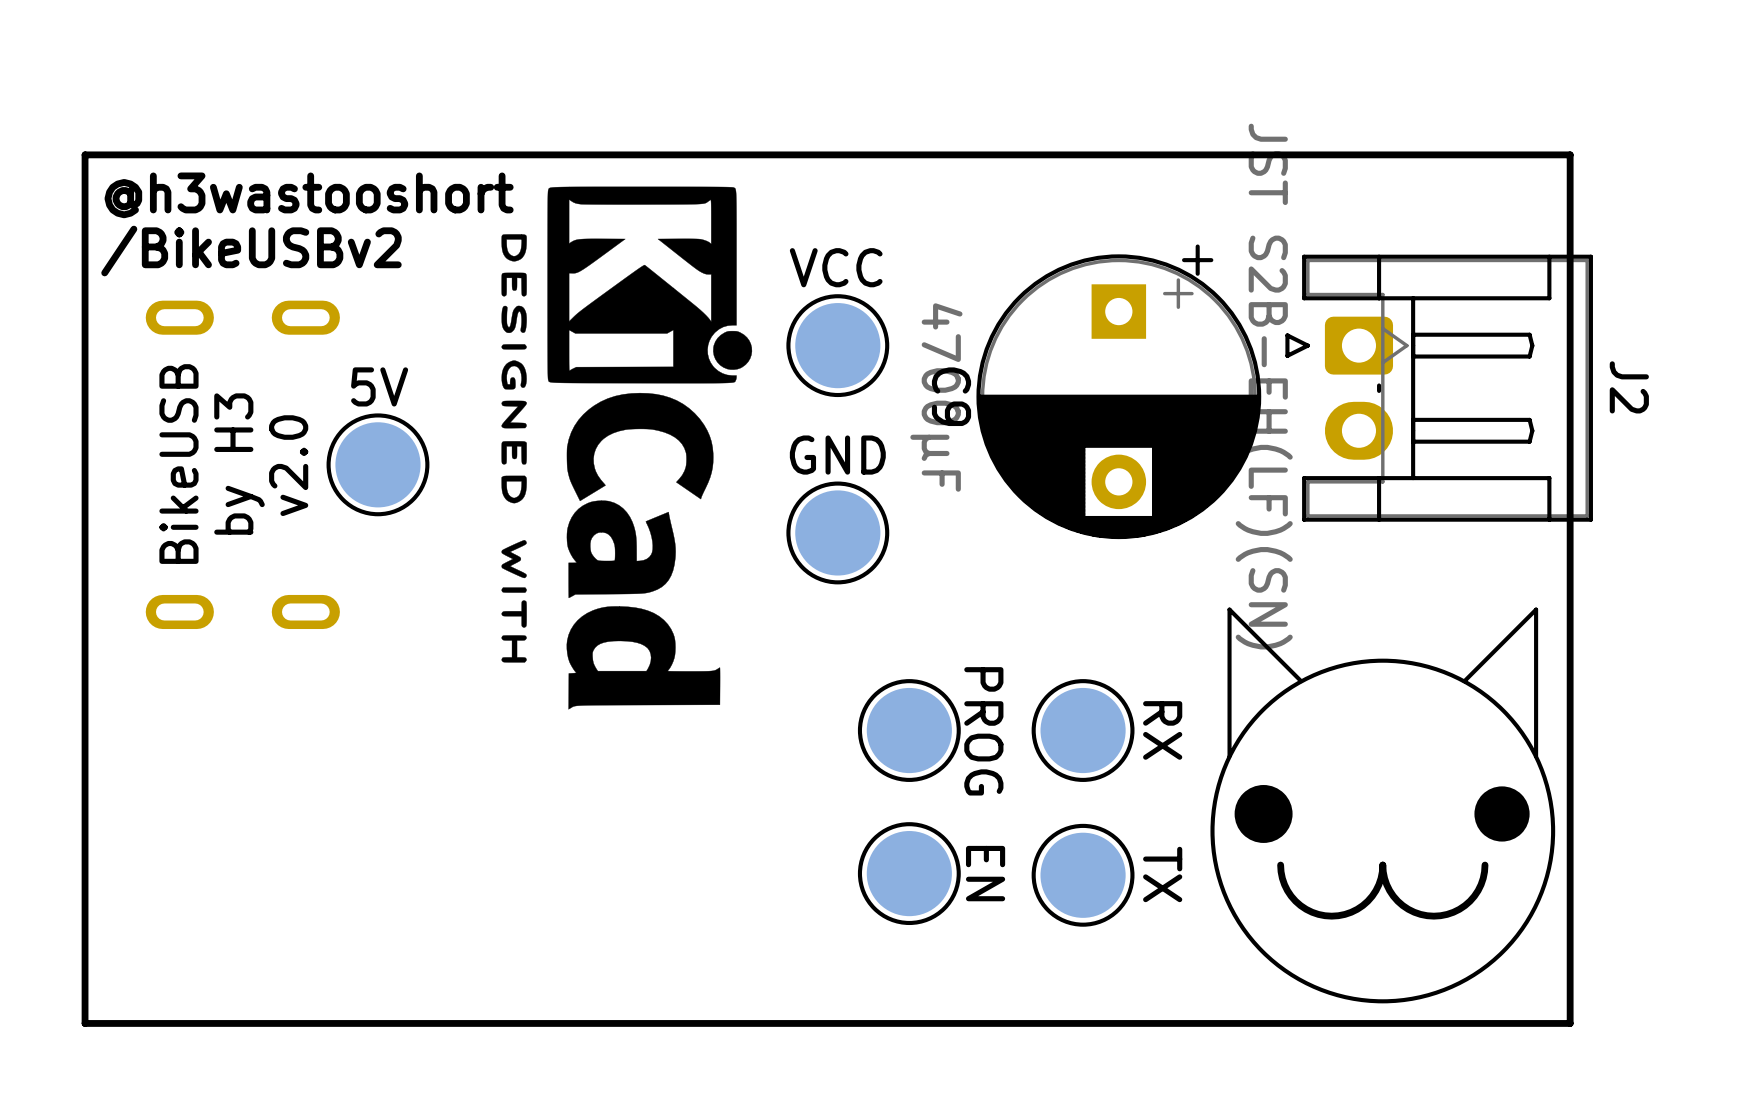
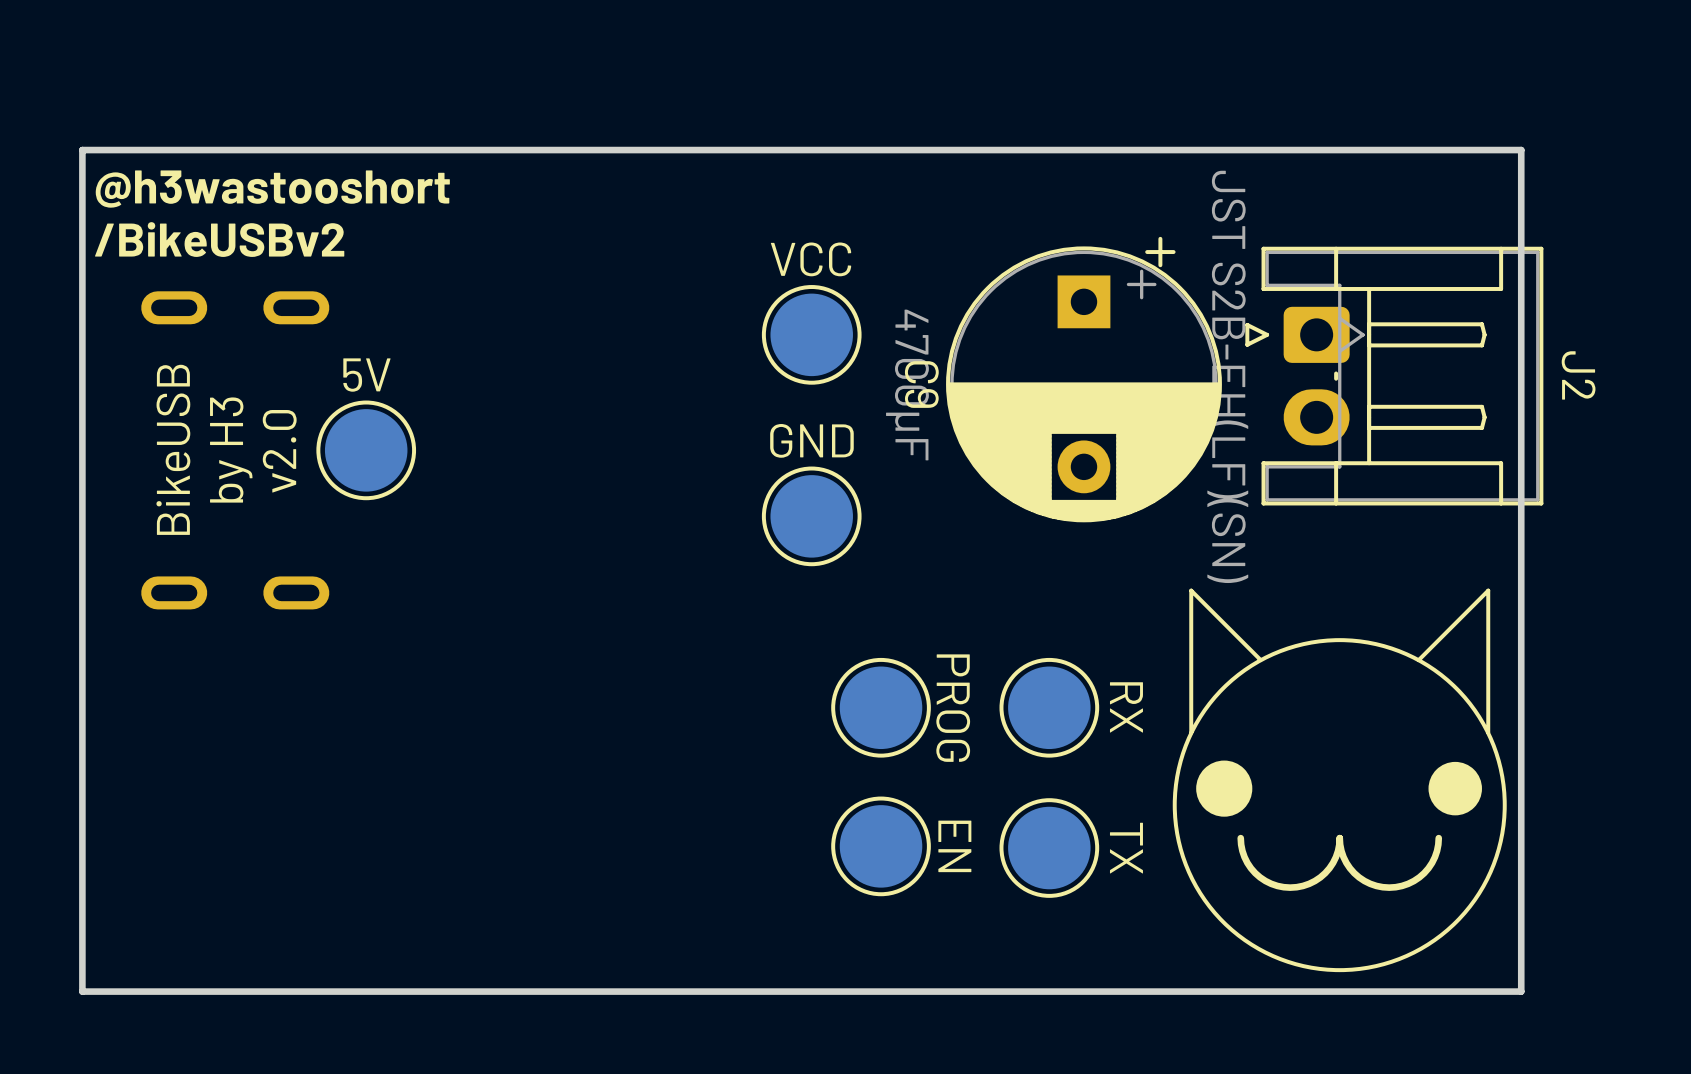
drawing: [501, 186, 753, 710] -> none

